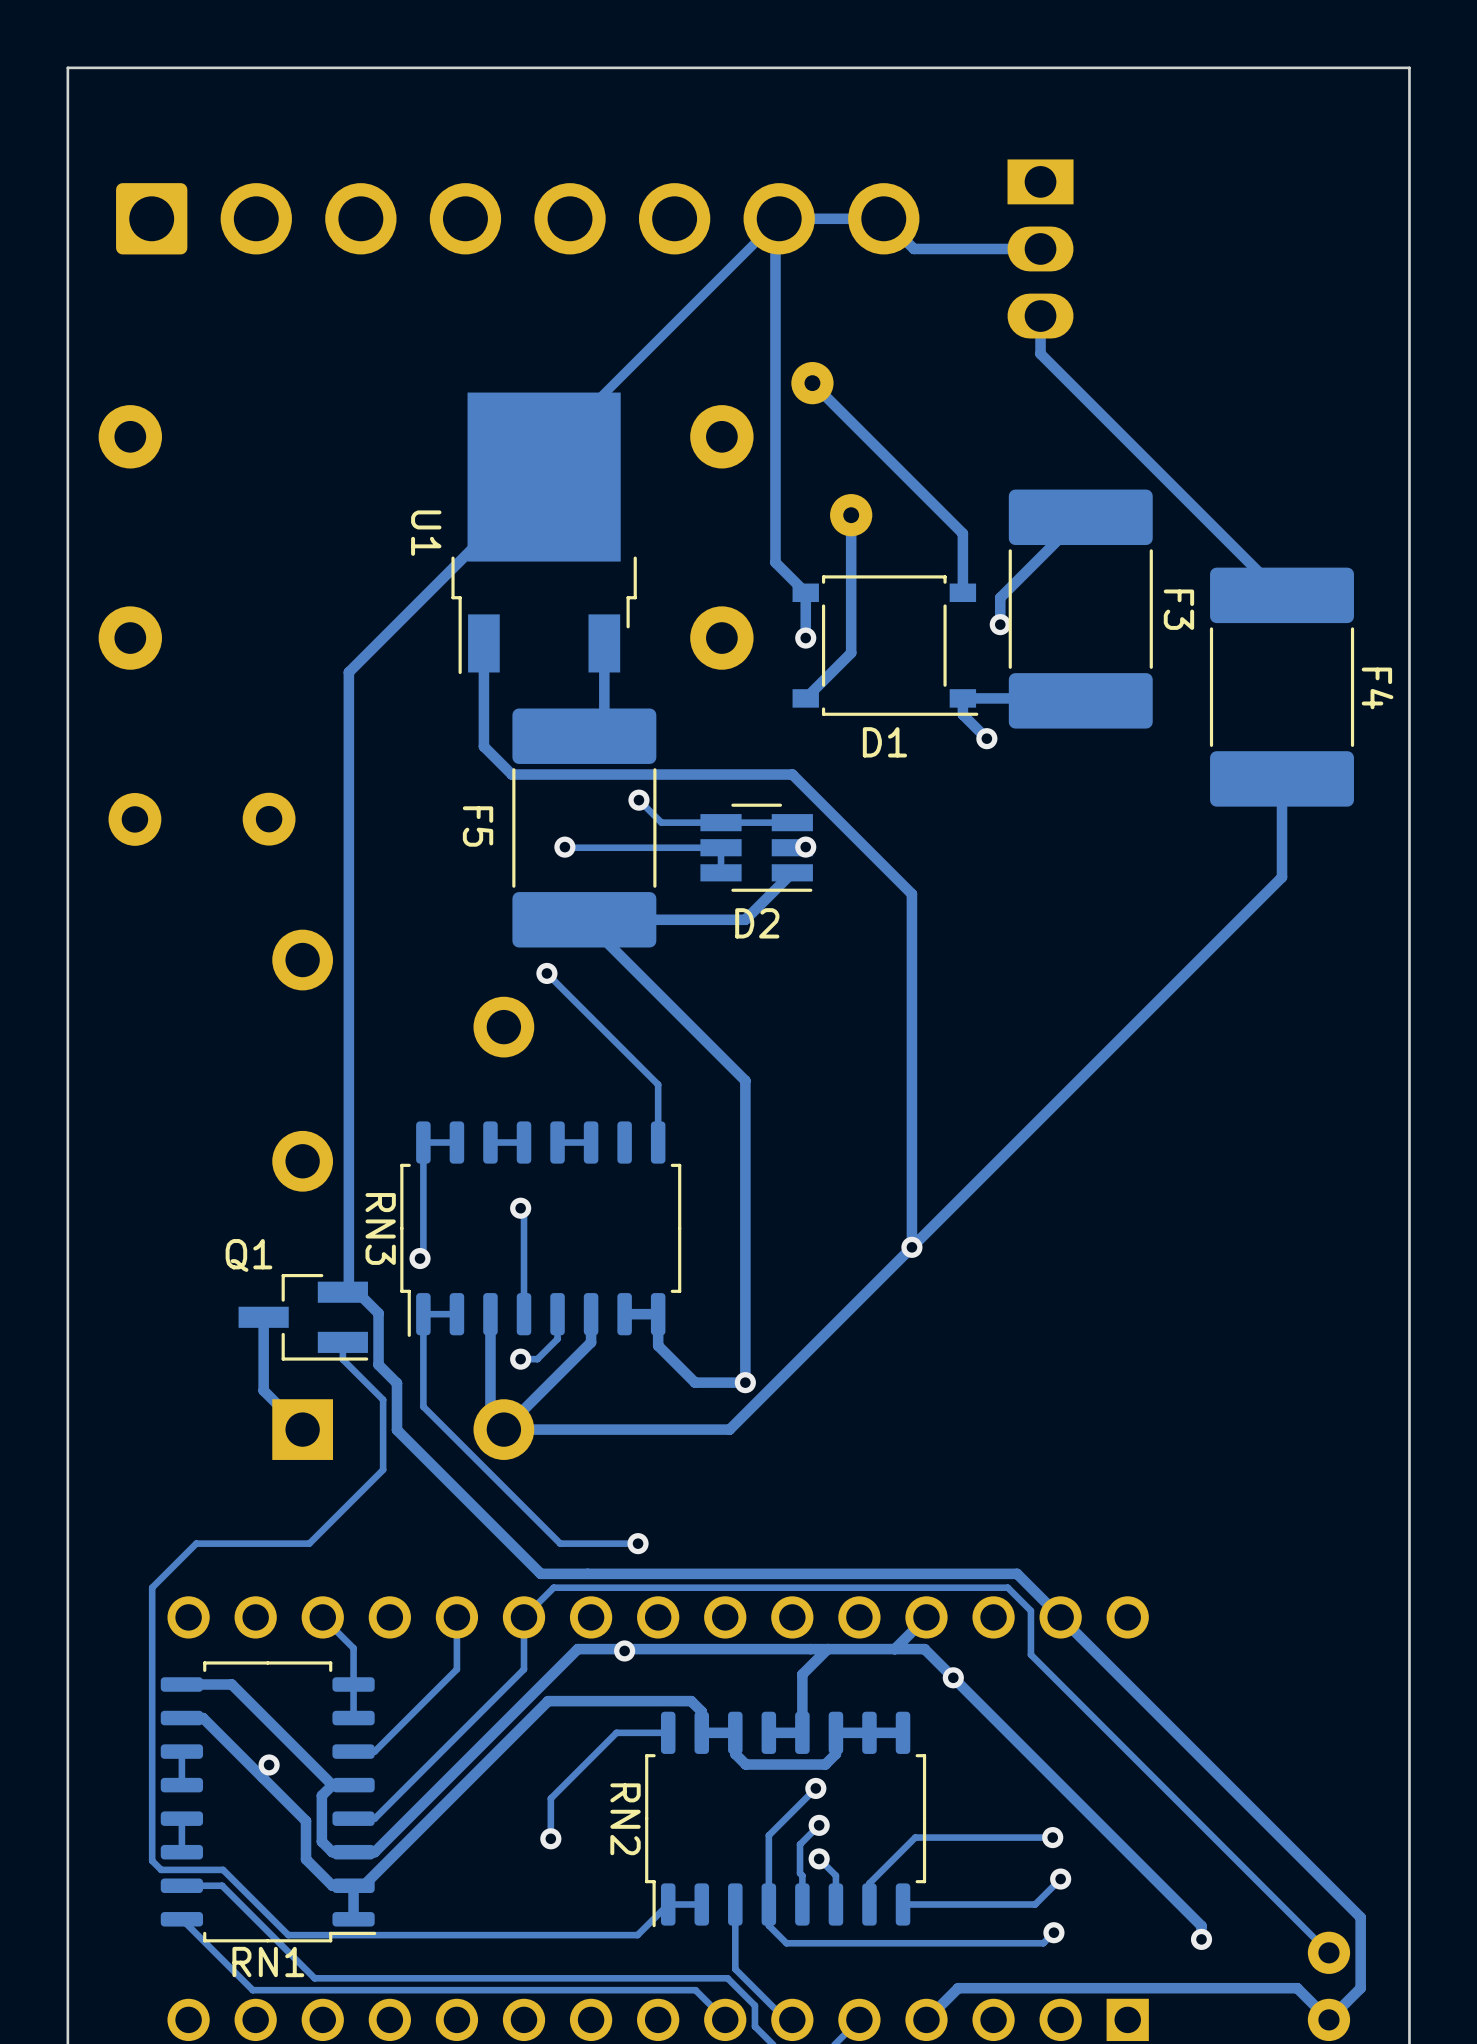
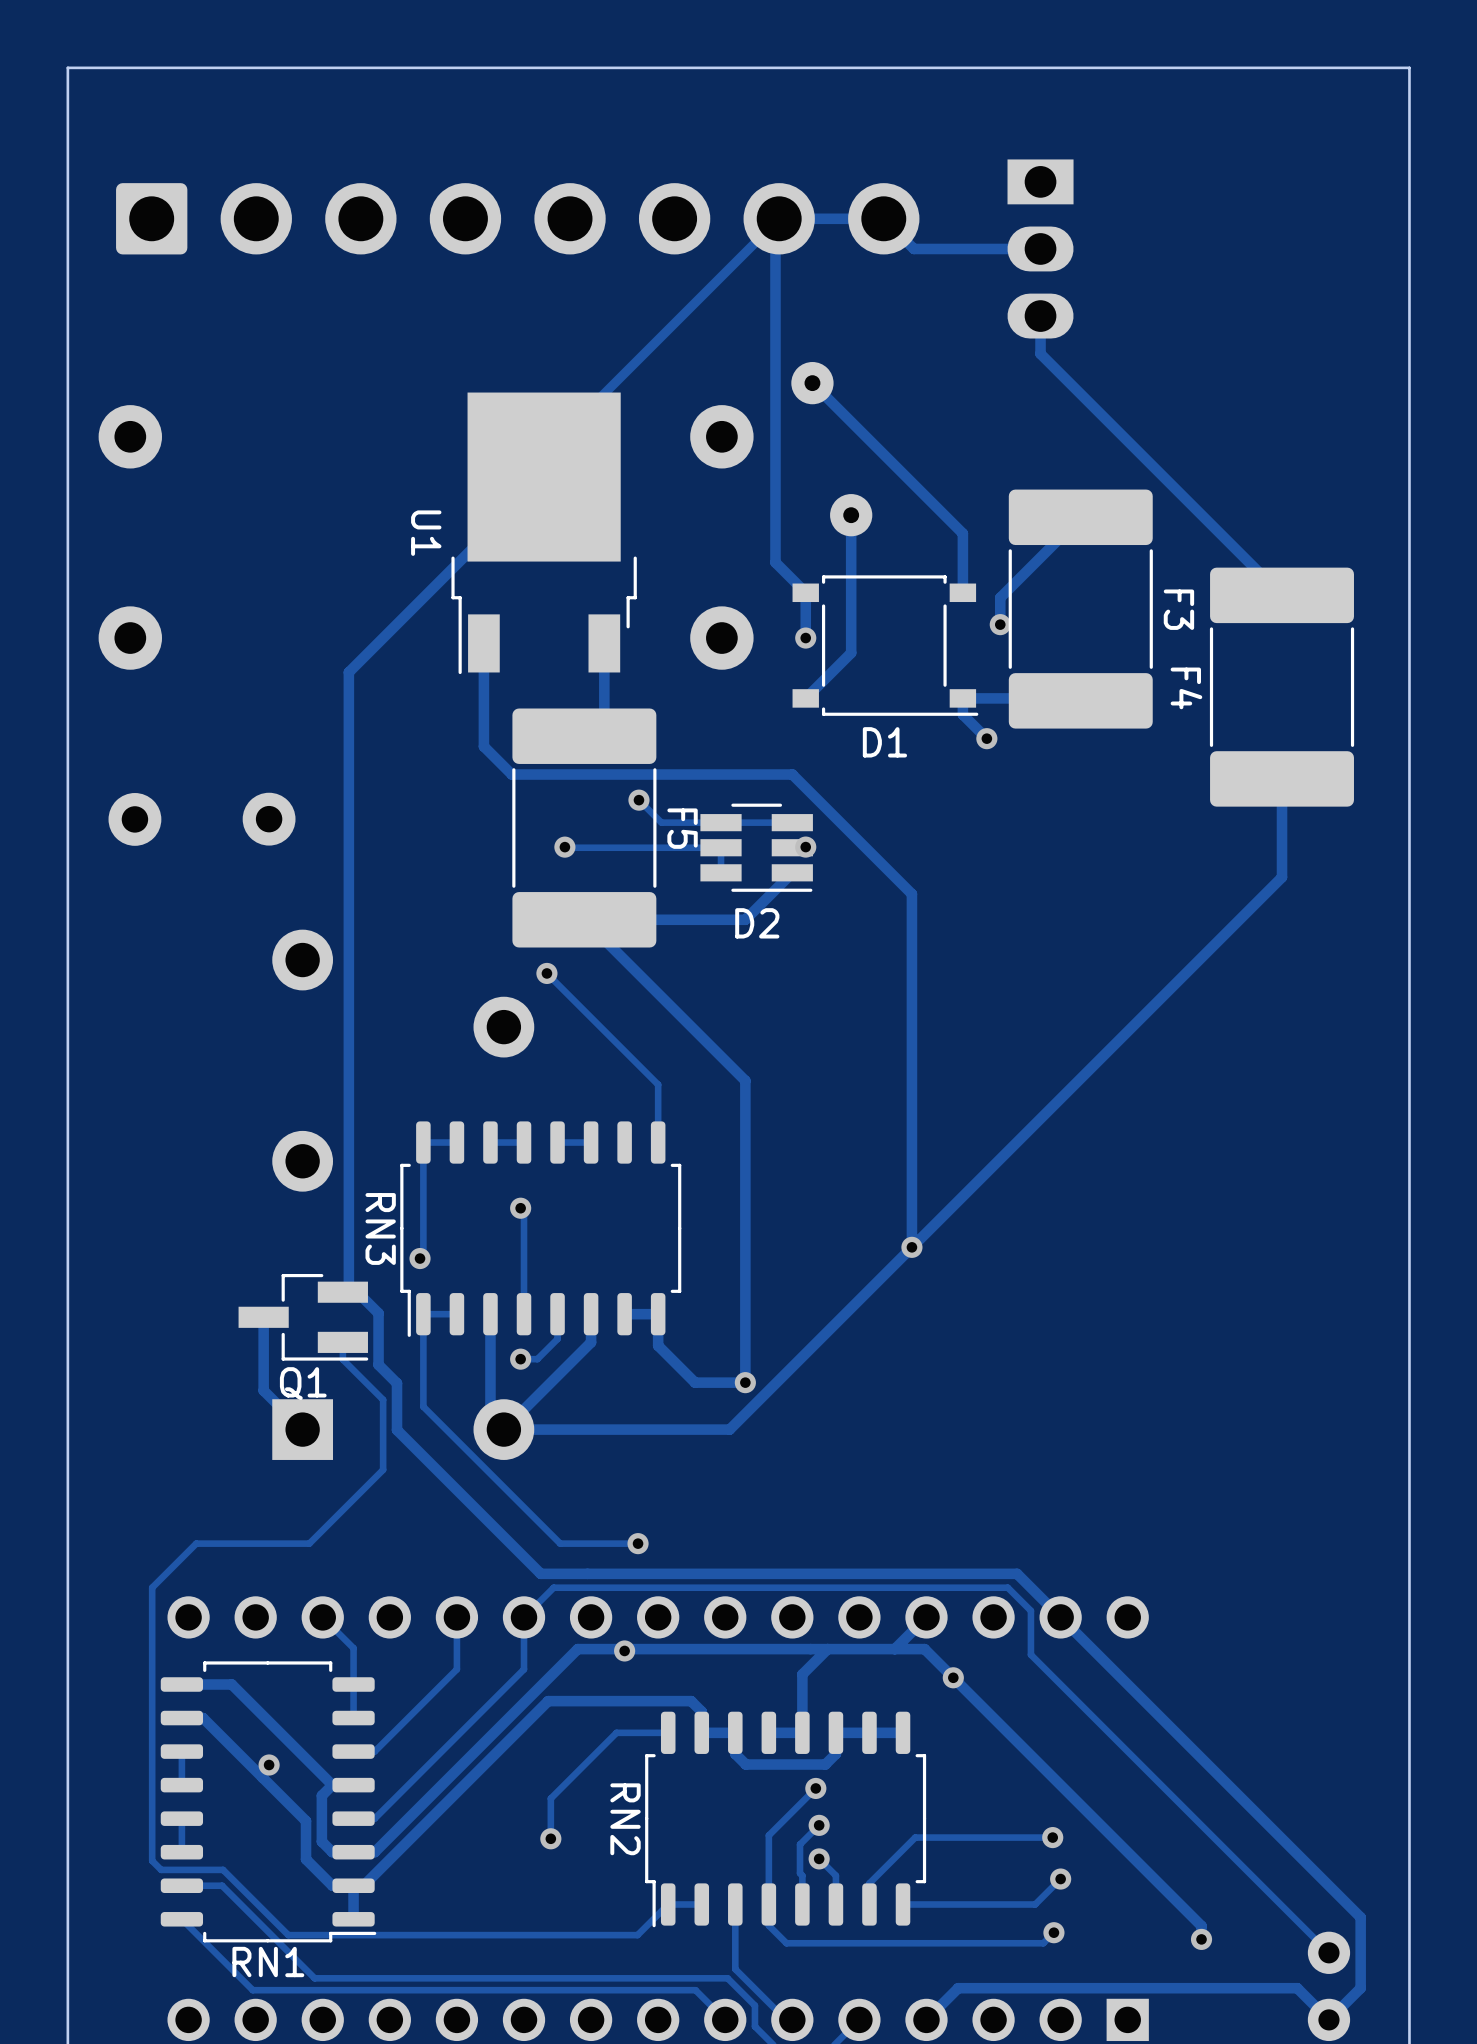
F4 name position: F4 (1377, 688) -> F4 (1186, 688)
F5 name position: F5 (478, 826) -> F5 (682, 828)
Q1 name position: Q1 (248, 1255) -> Q1 (303, 1383)

